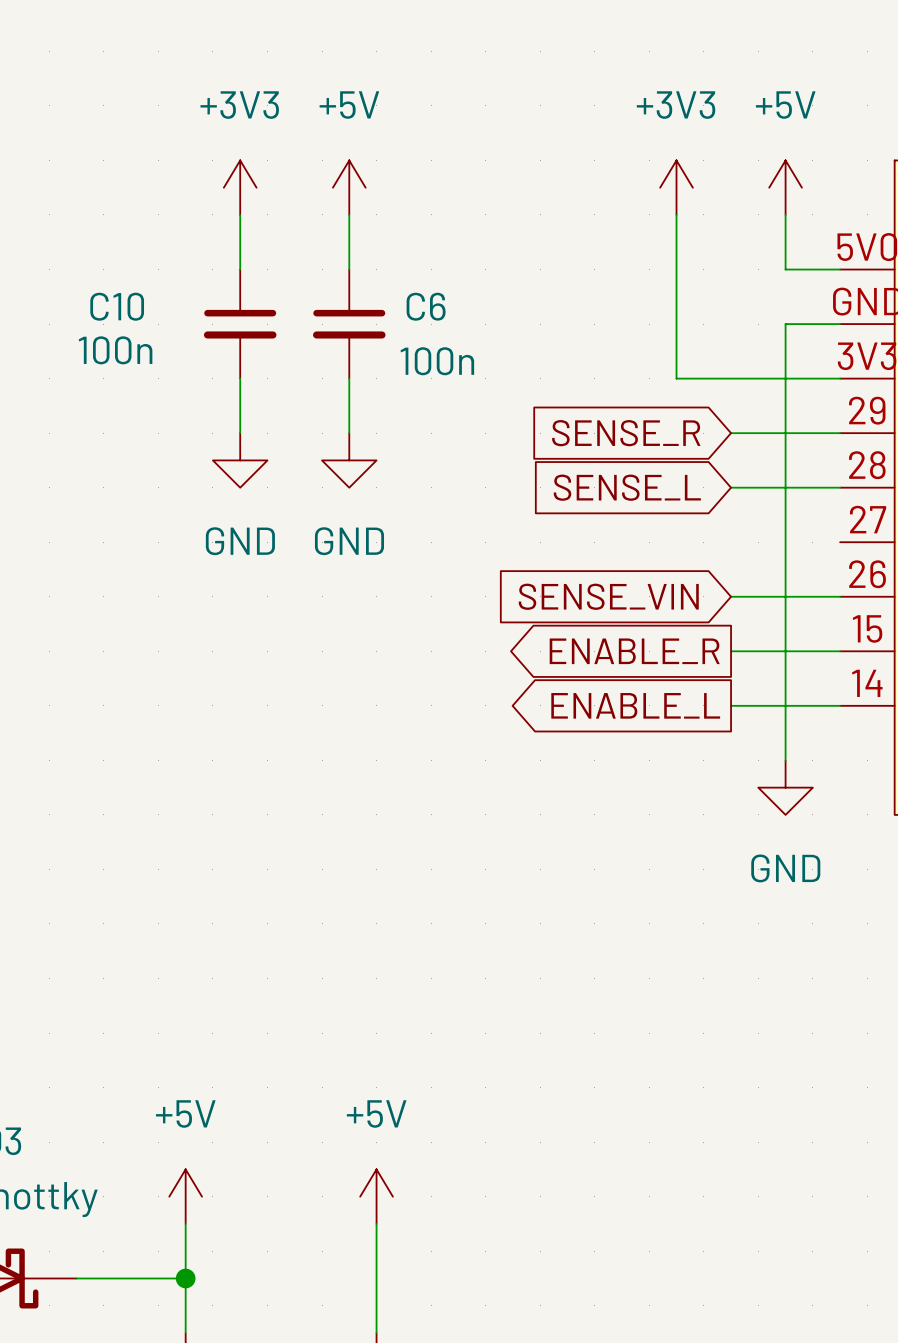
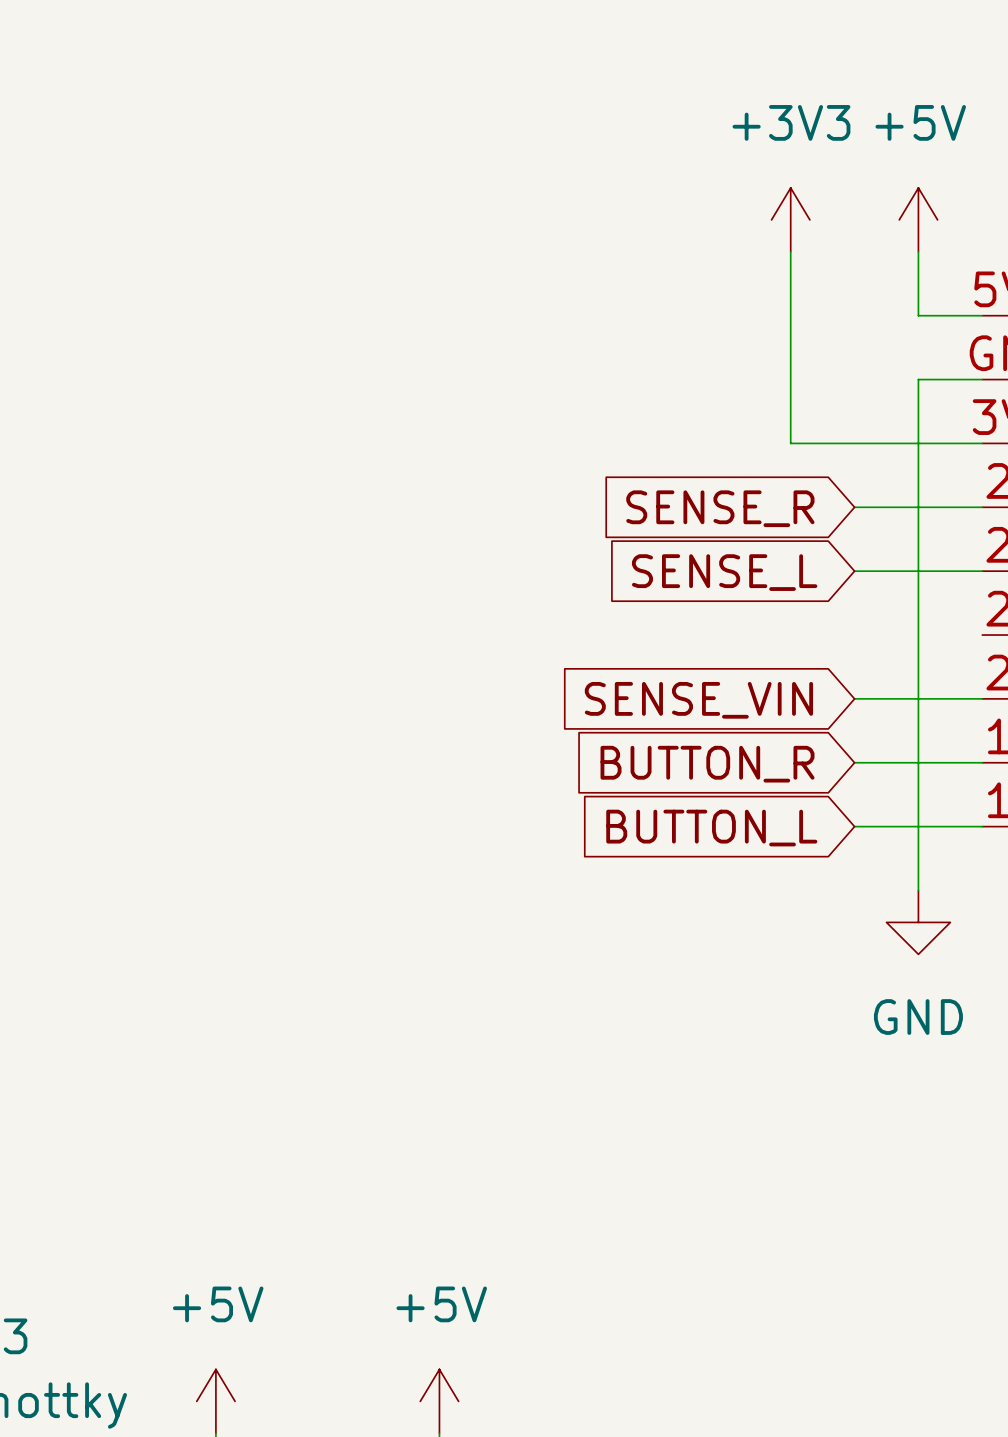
power symbol: +3V3 (240, 187) -> none
power symbol: +5V (349, 187) -> none
wire: (240, 214) (240, 269) -> none
wire: (349, 214) (349, 269) -> none
C10: 100n (240, 324) -> none
C6: 100n (349, 324) -> none
wire: (240, 378) (240, 433) -> none
wire: (349, 378) (349, 433) -> none
power symbol: GND (240, 460) -> none
power symbol: GND (349, 460) -> none
global label shape: output (634, 651) -> input (707, 764)
global label: ENABLE_R (634, 651) -> BUTTON_R (707, 764)
global label shape: output (635, 705) -> input (711, 828)
global label: ENABLE_L (635, 705) -> BUTTON_L (711, 828)

